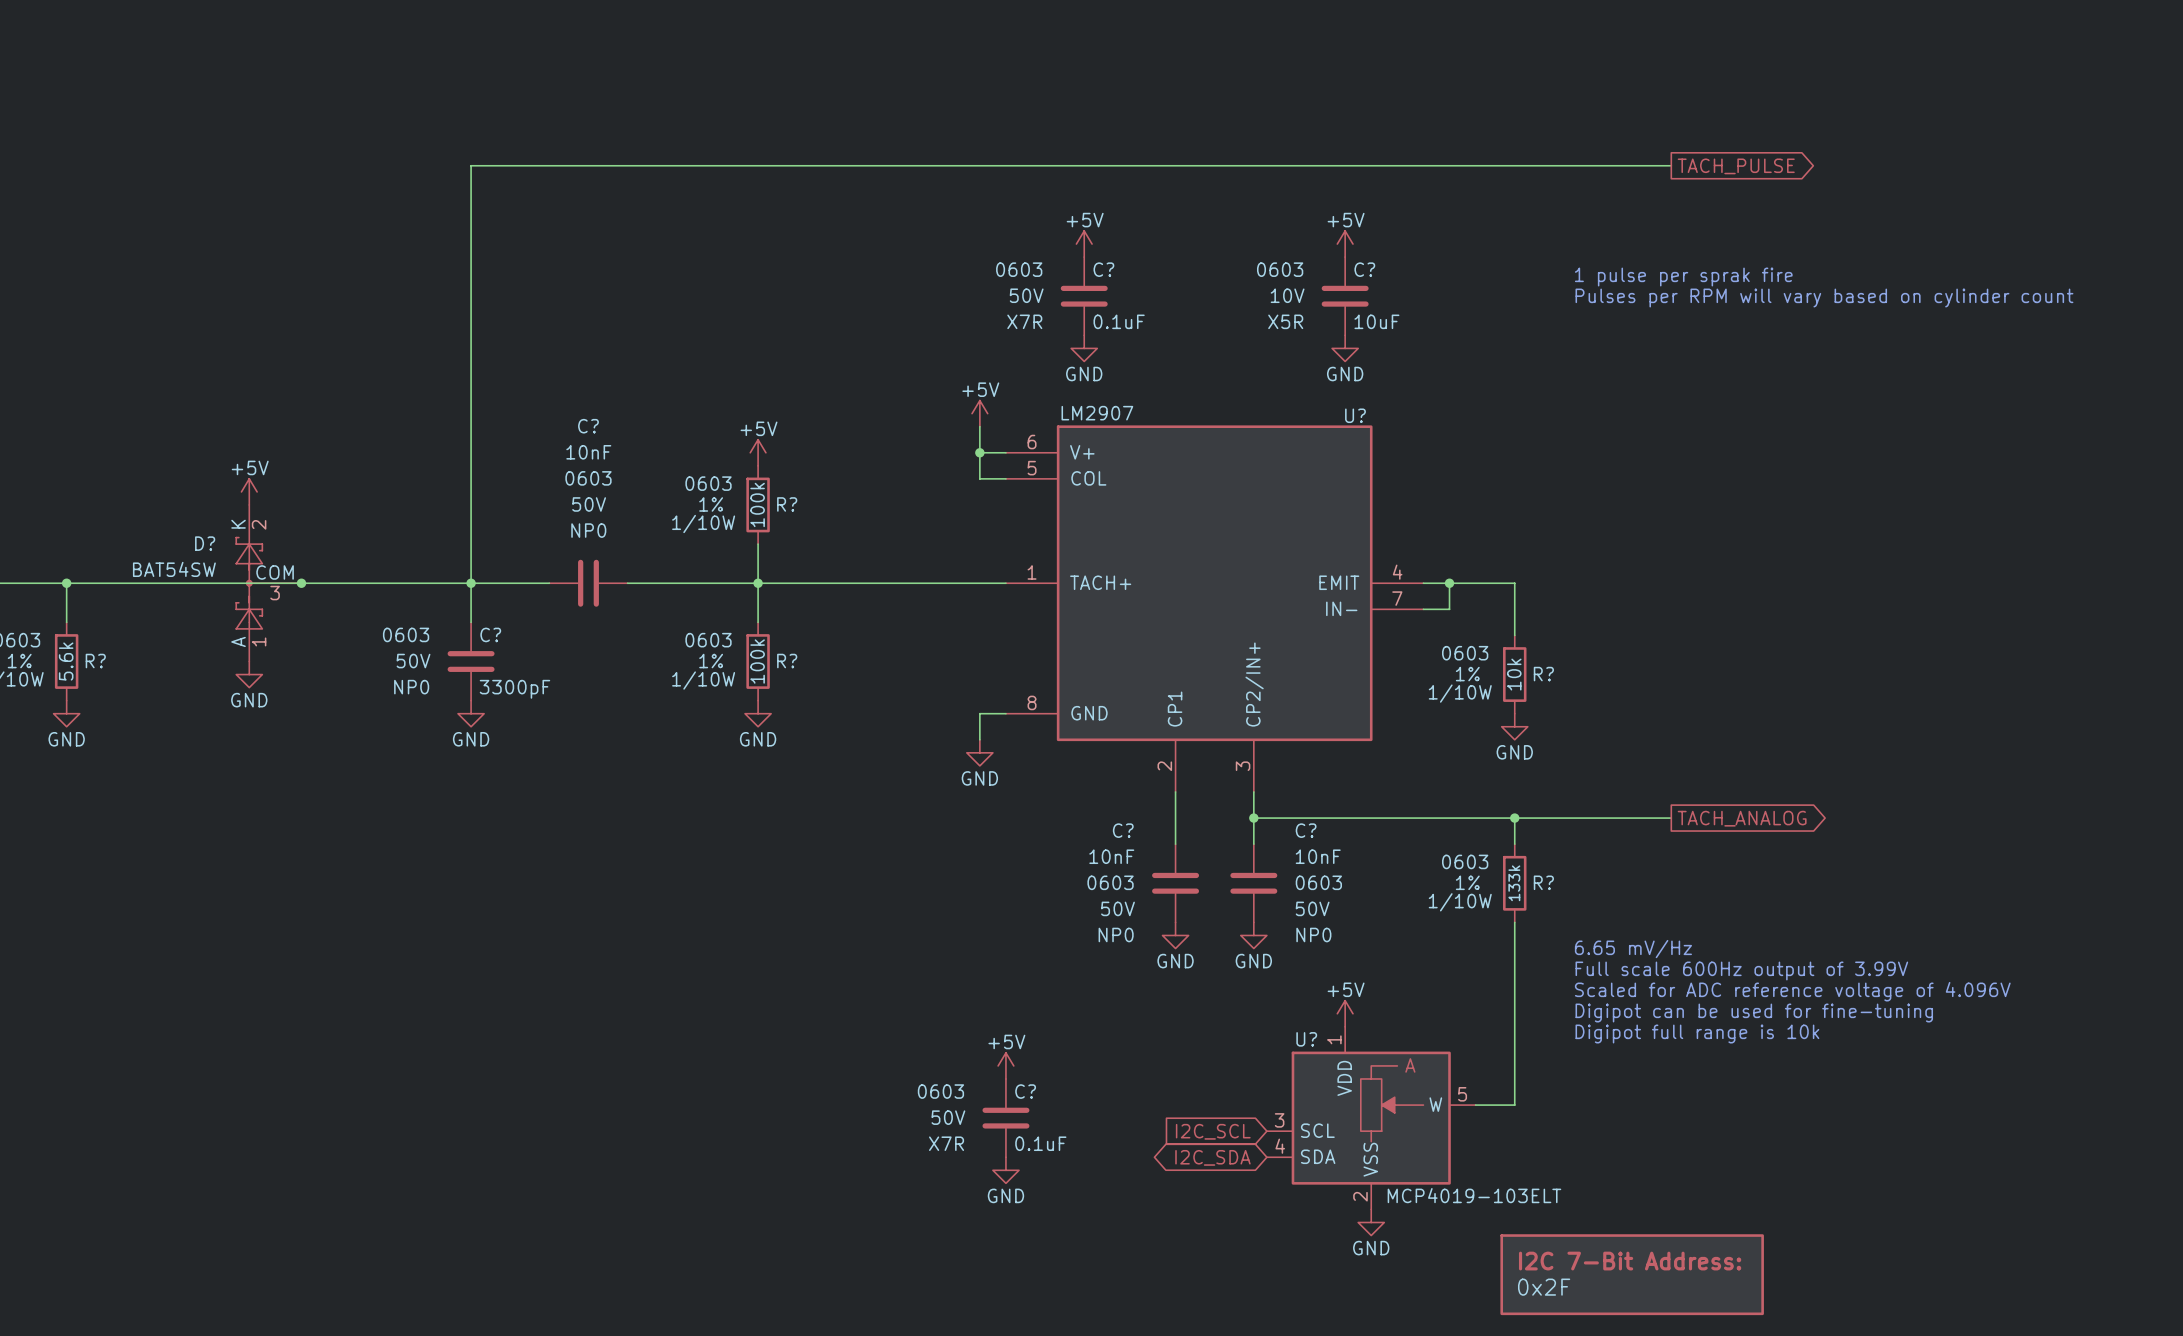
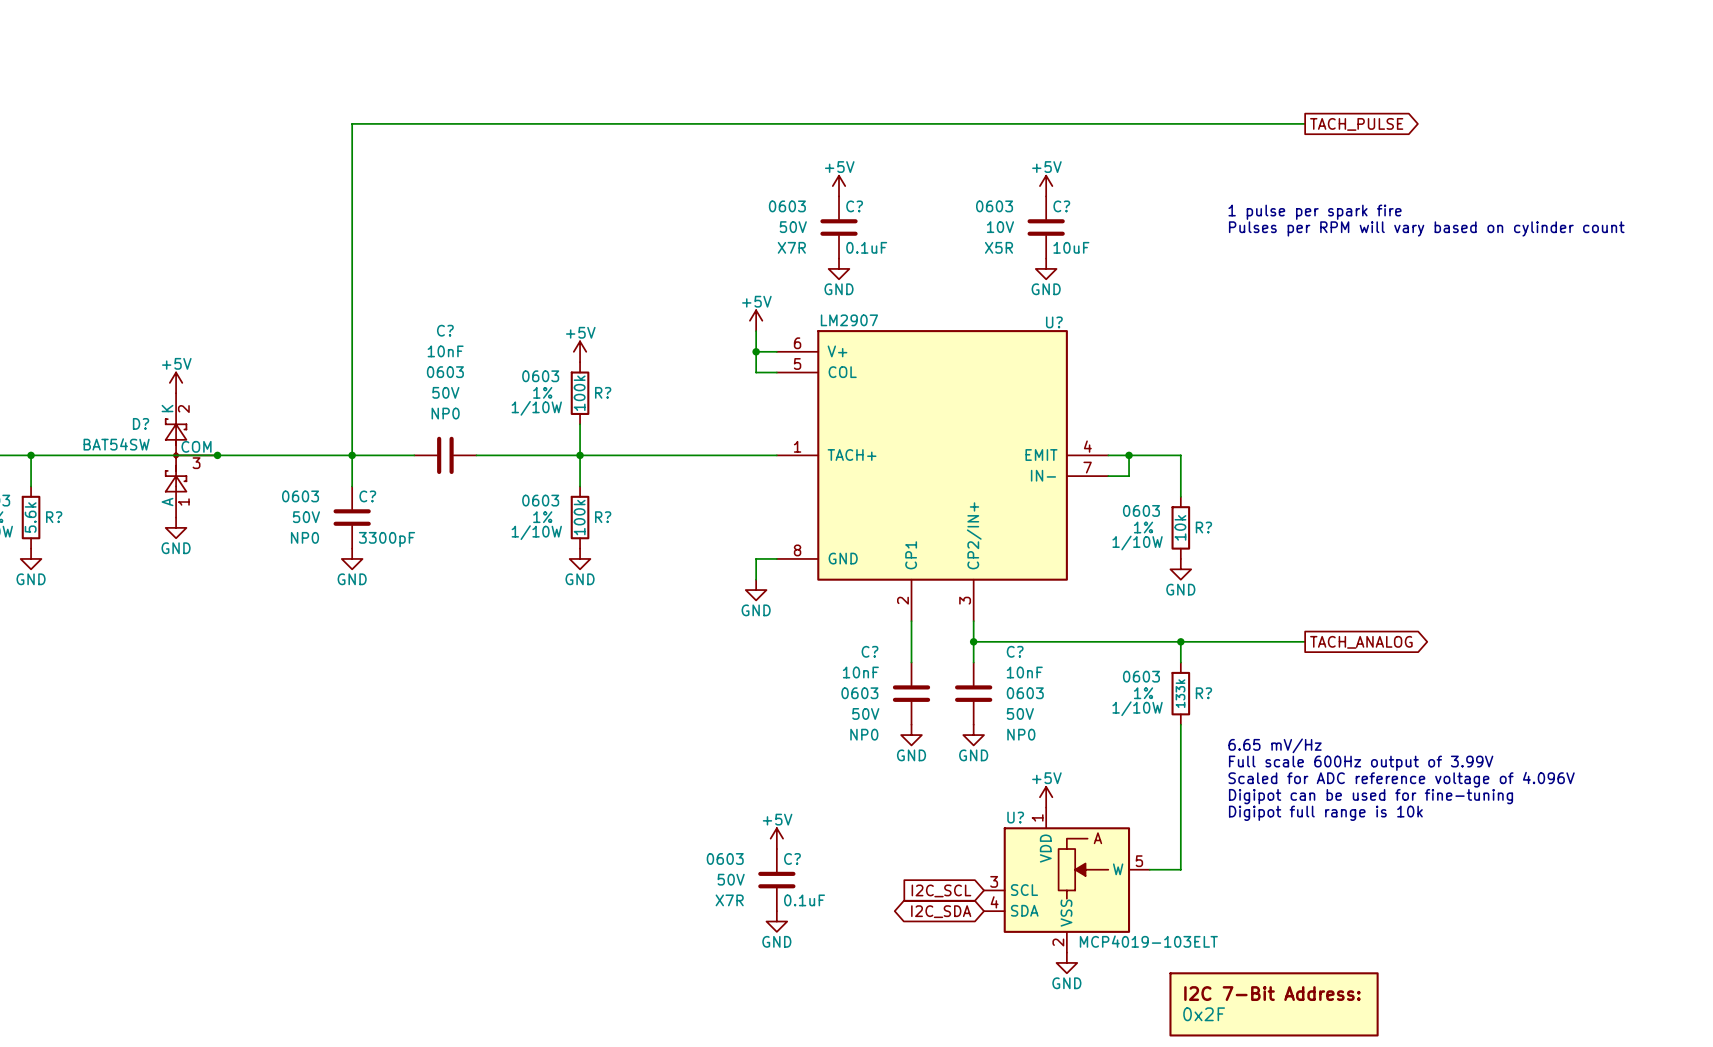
text: 1 pulse per sprak fire (1683, 277) -> 1 pulse per spark fire (1315, 212)

